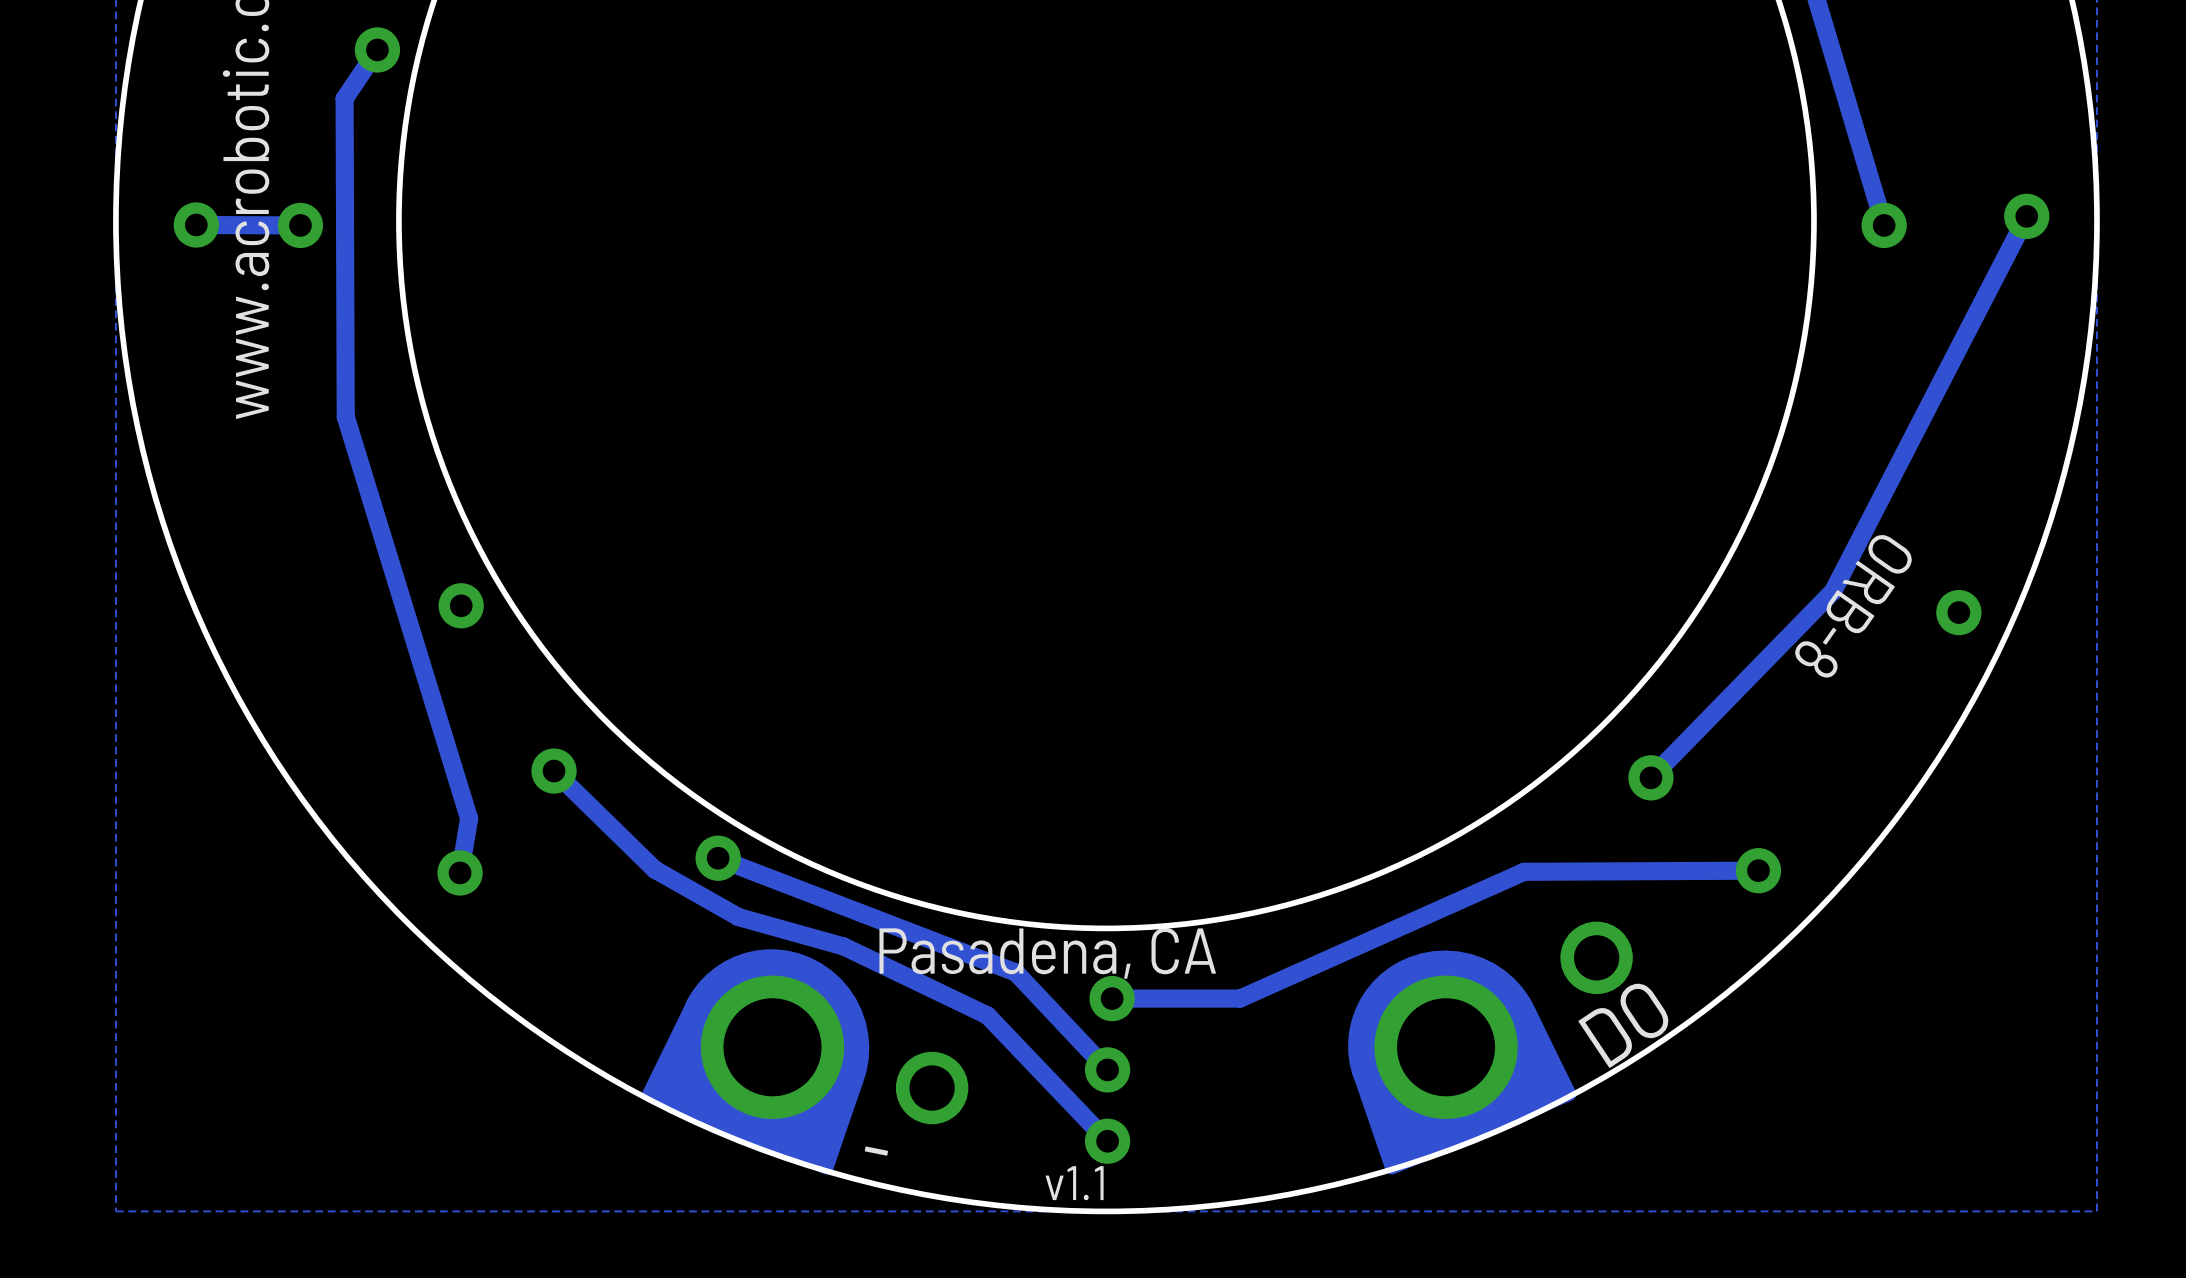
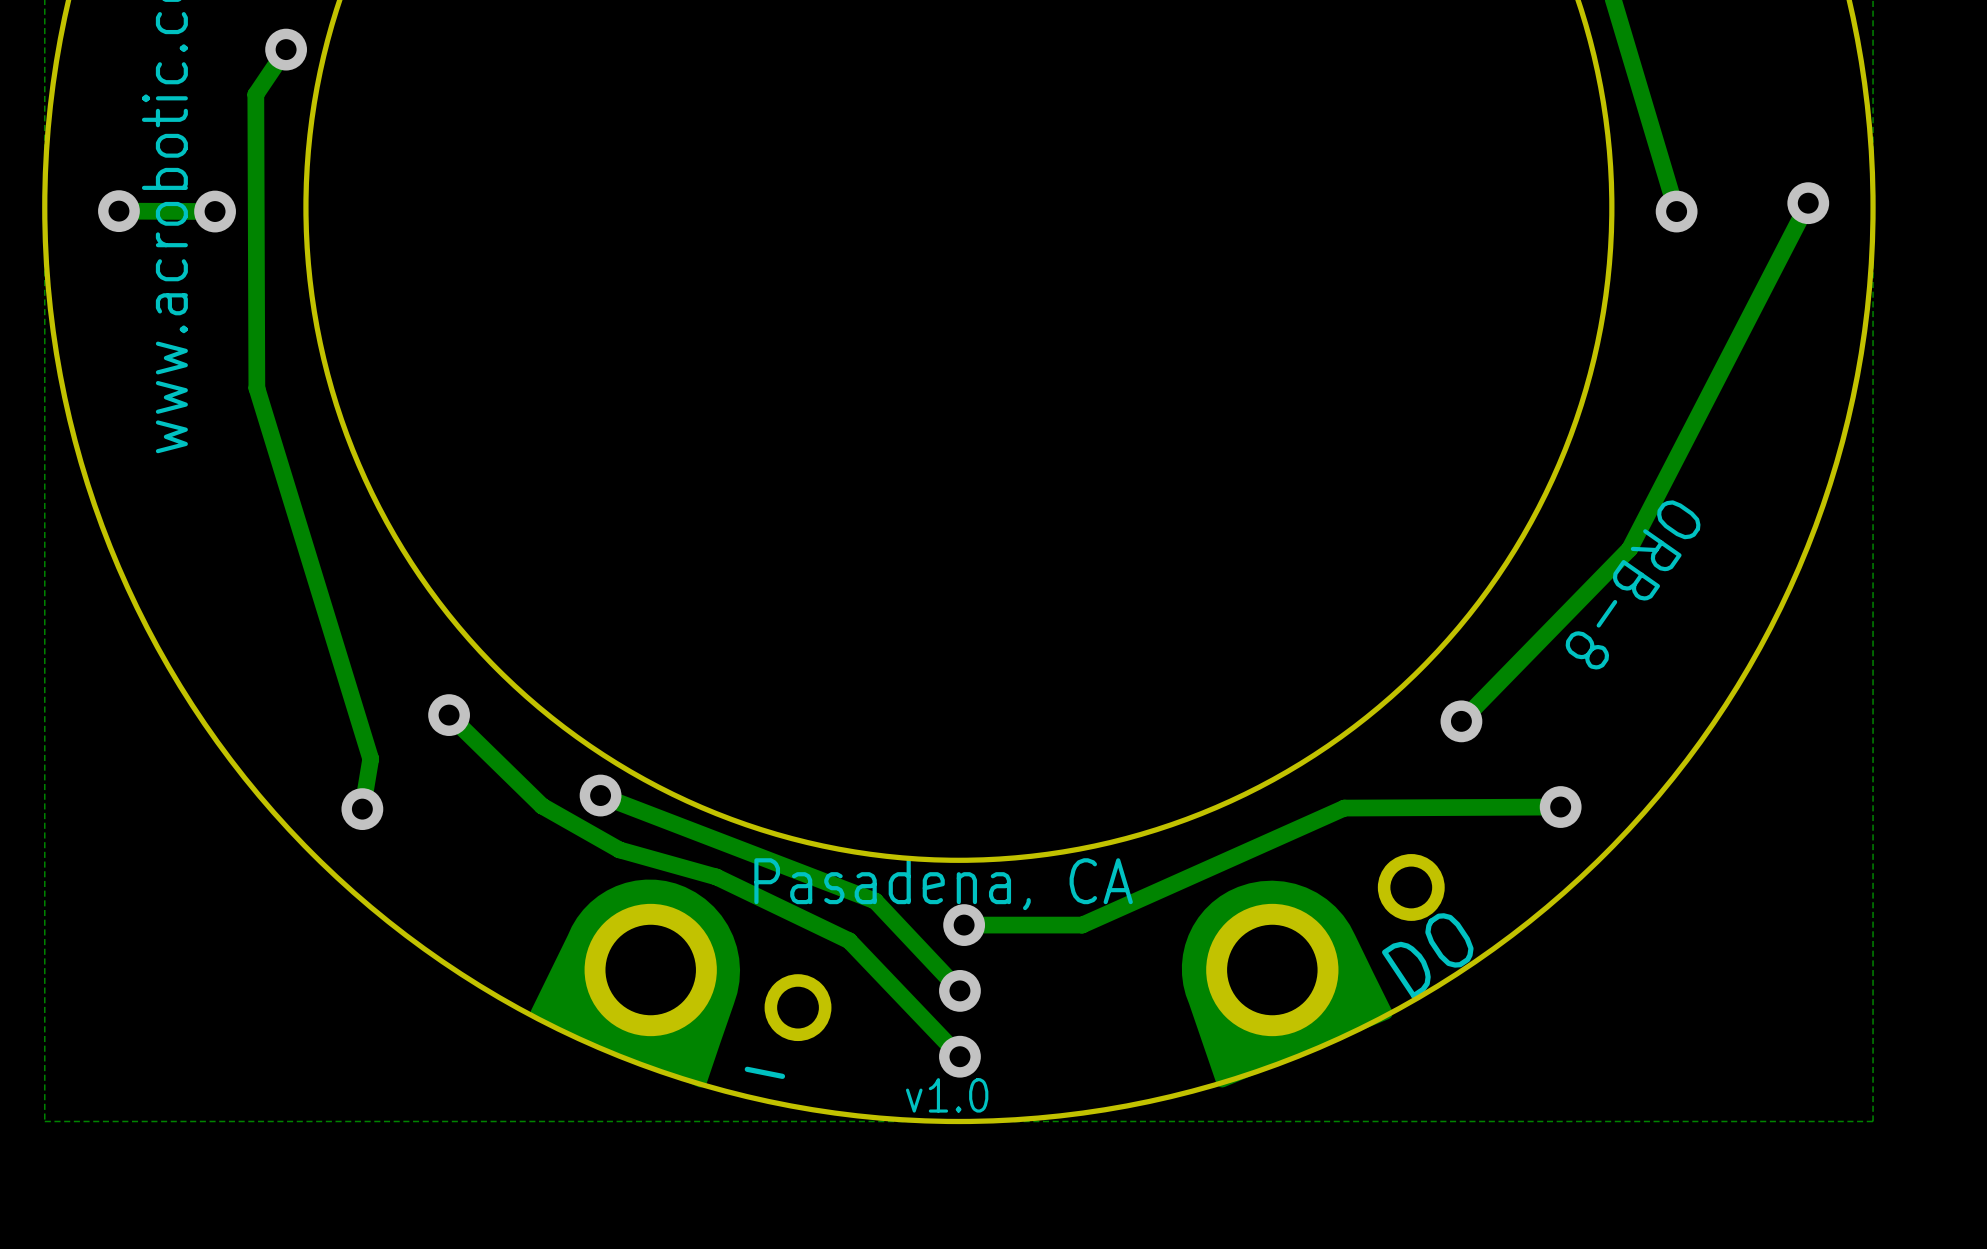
via: (461, 605) -> none
via: (1958, 612) -> none
text: v1.1 (1074, 1183) -> v1.0 (947, 1095)

